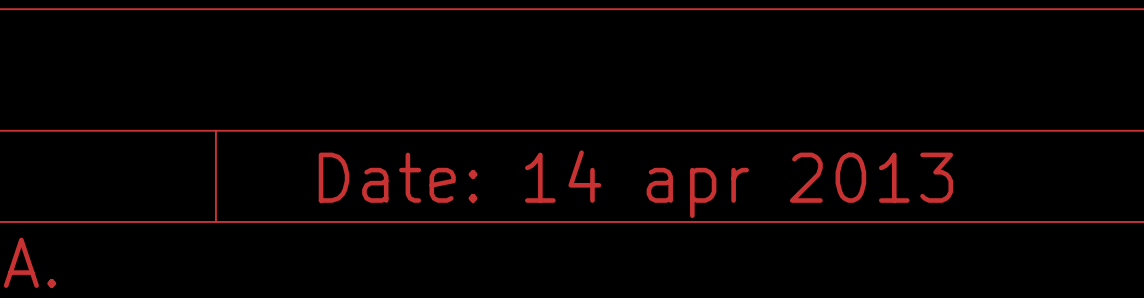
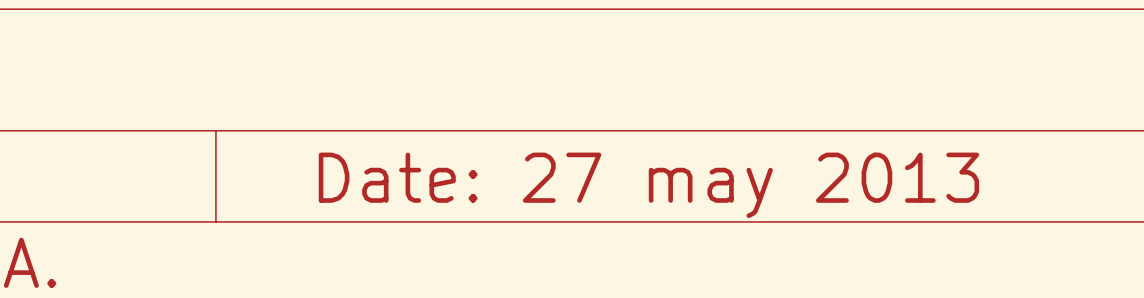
title block: Date: 14 apr 2013 (635, 184) -> Date: 27 may 2013 (648, 185)

